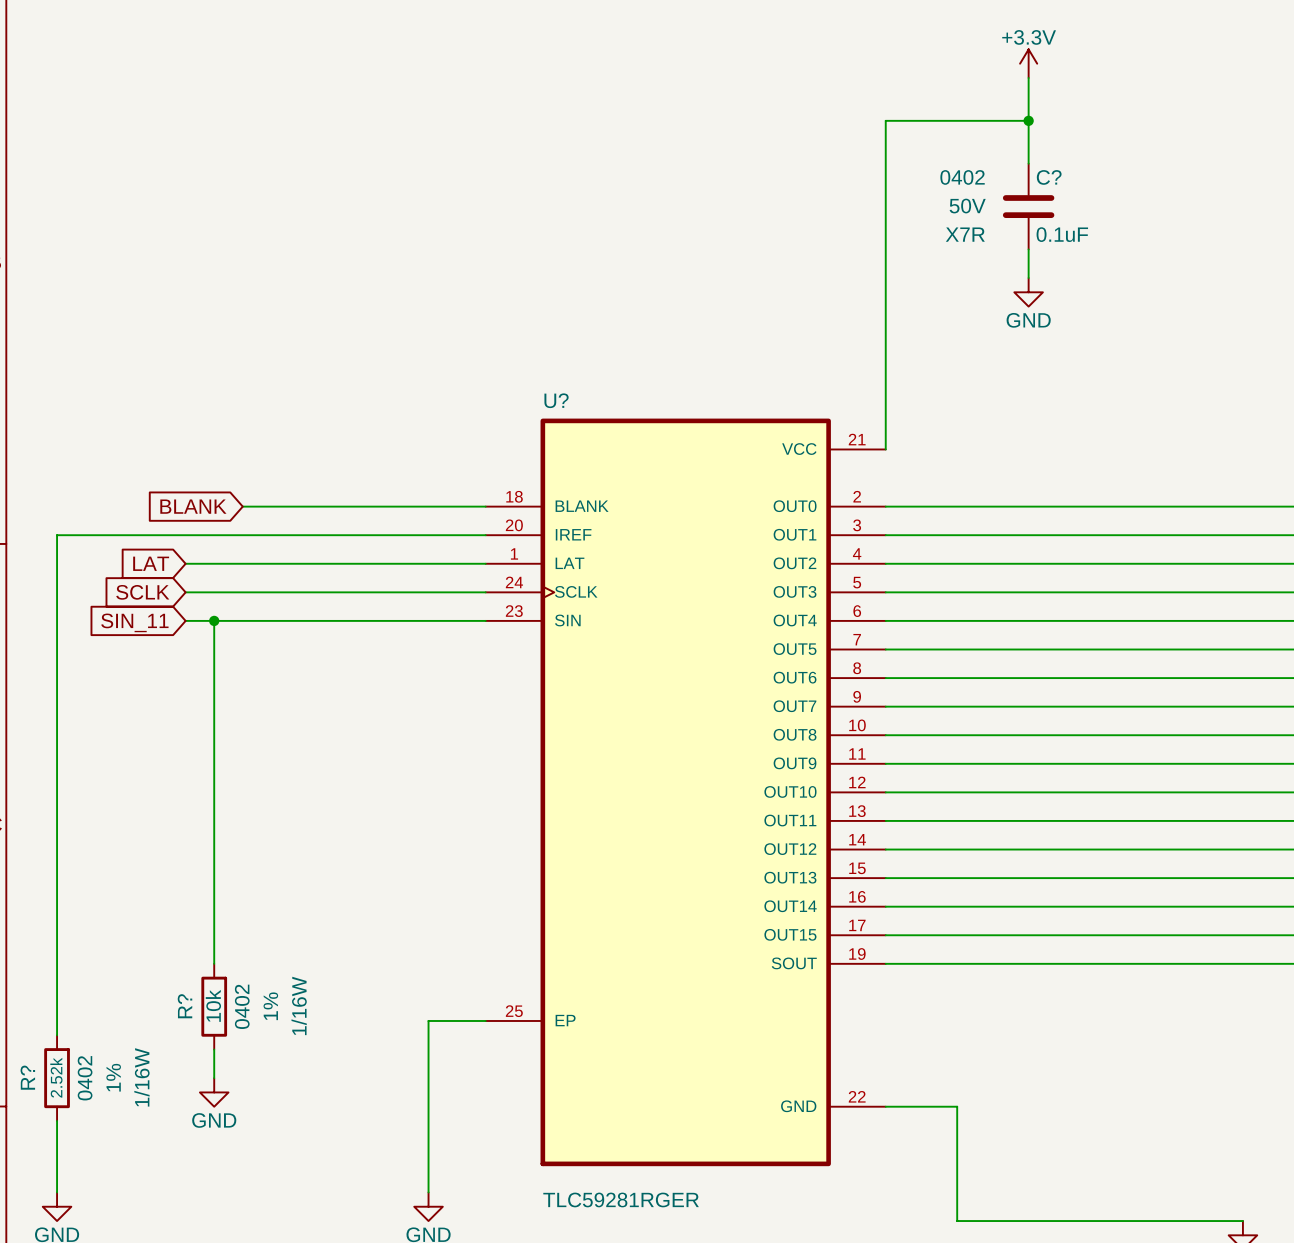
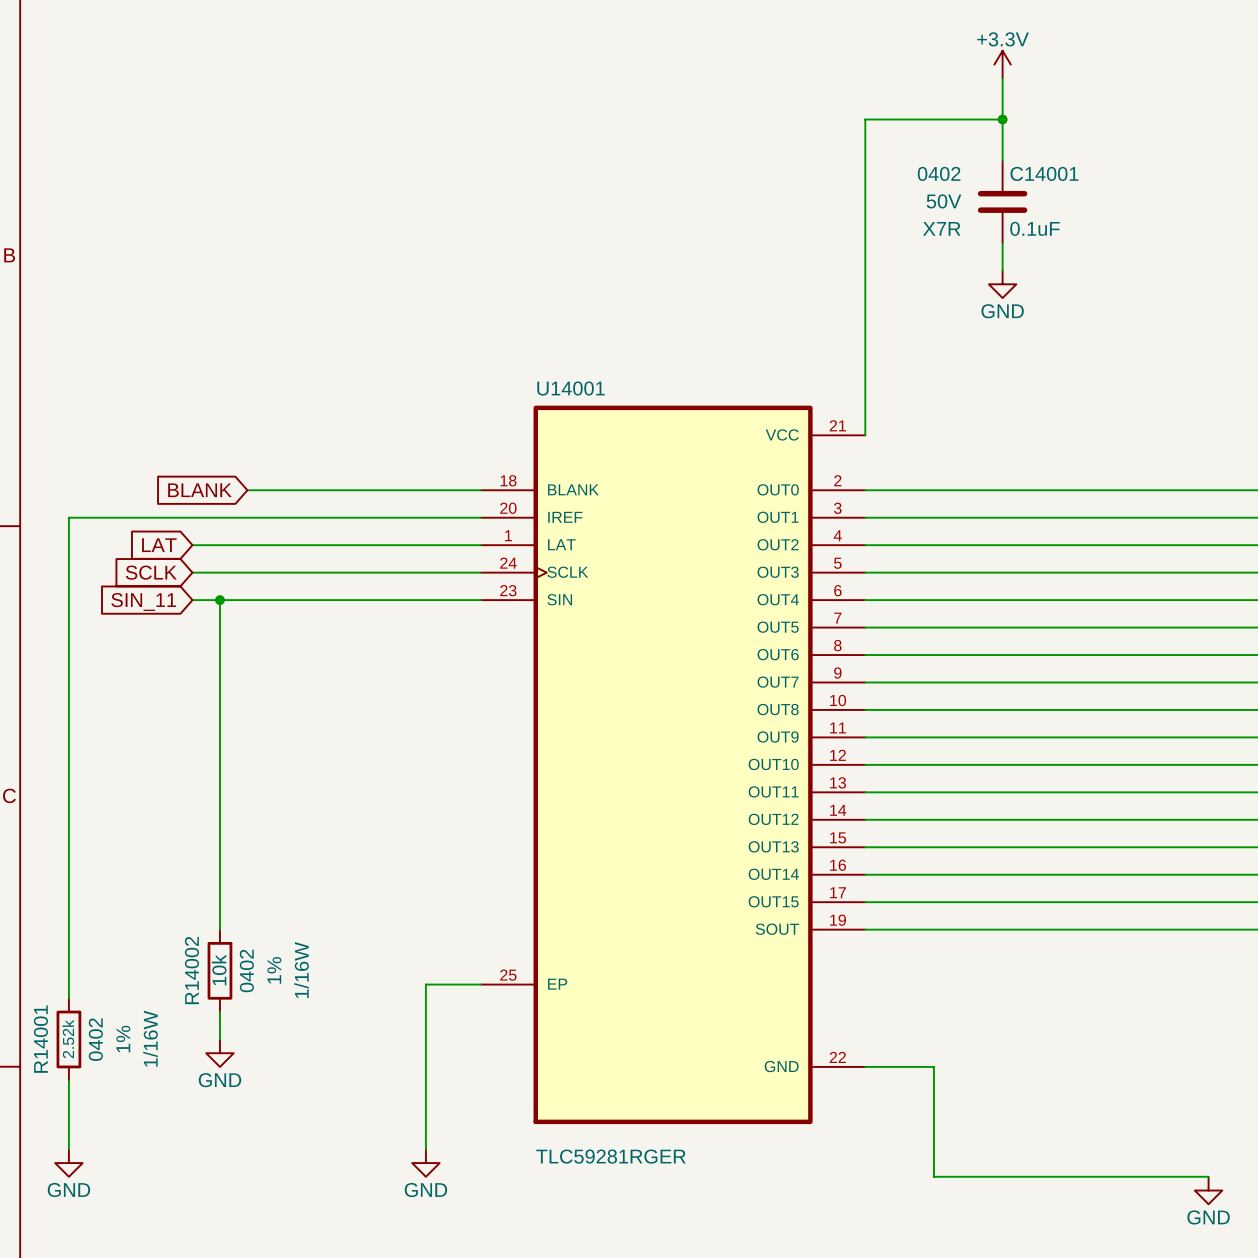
C? name: C? (1049, 177) -> C14001 (1044, 173)
U? name: U? (556, 400) -> U14001 (571, 388)
R? name: R? (184, 1006) -> R14002 (191, 970)
R? name: R? (27, 1077) -> R14001 (40, 1039)

